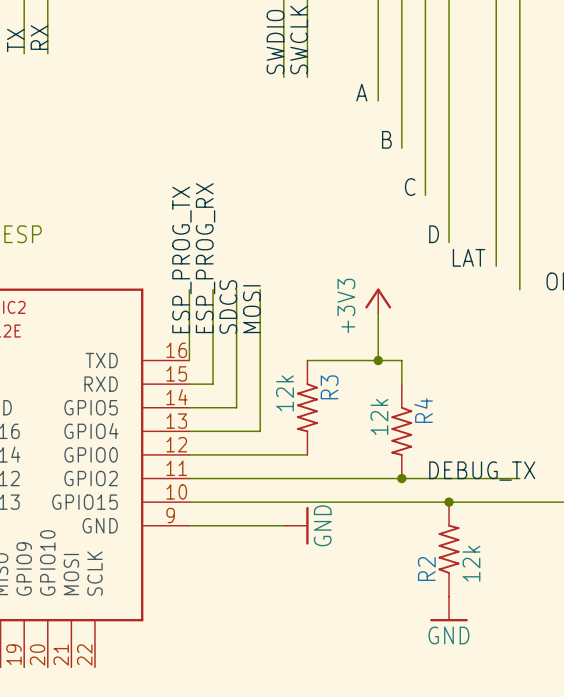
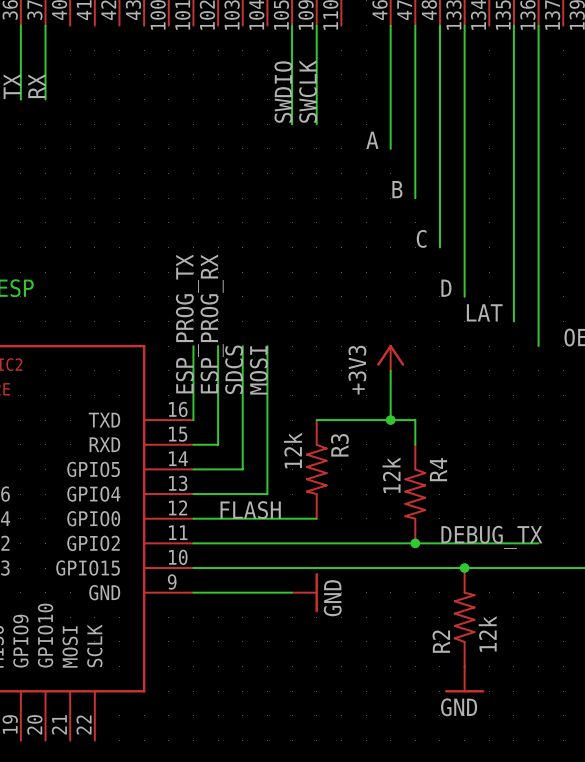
label: none -> FLASH (250, 510)

